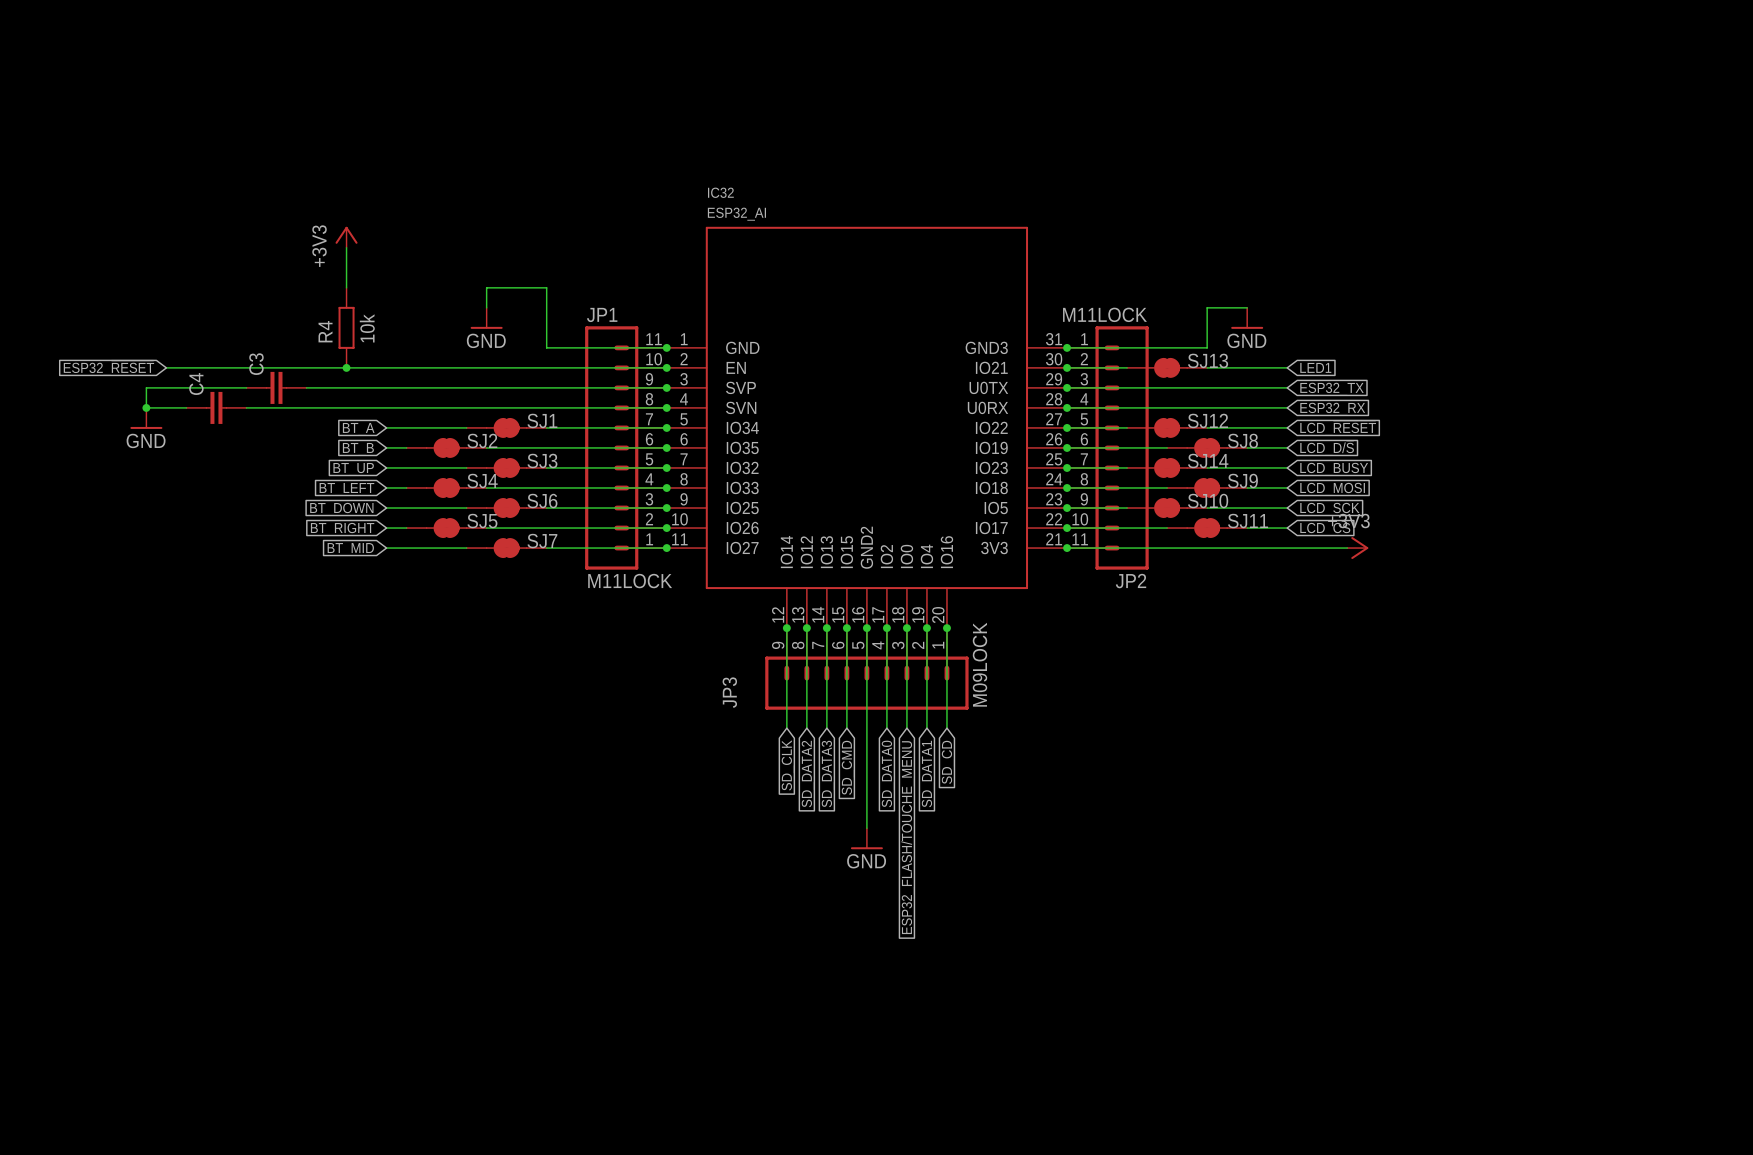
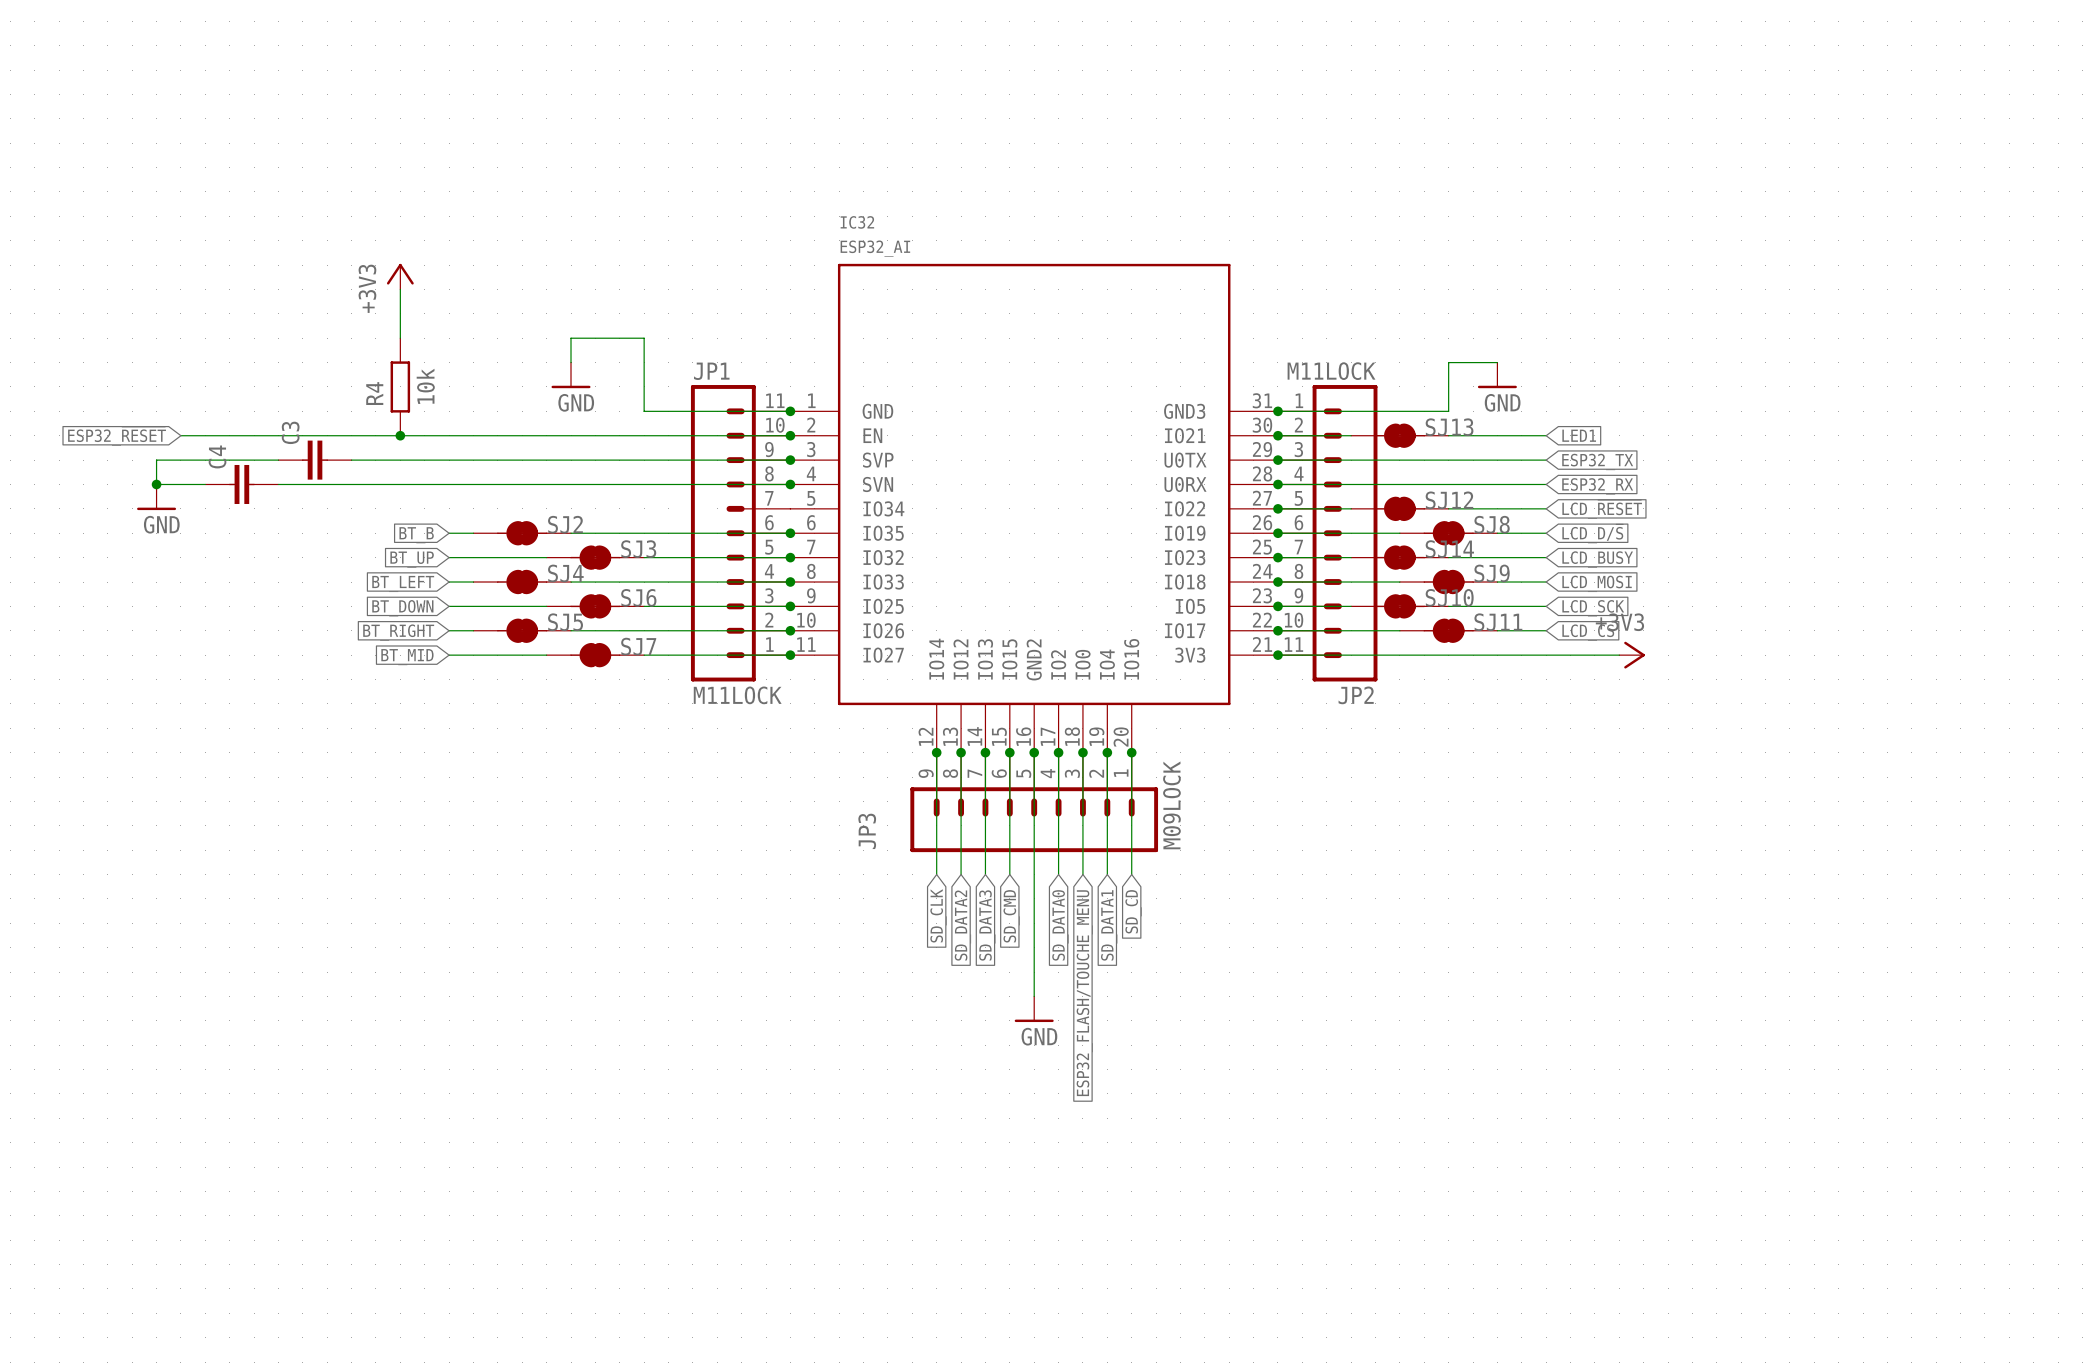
wire: (386, 427) (466, 427) -> none
SJ1: (506, 427) -> none
wire: (546, 427) (666, 427) -> none
junction: (666, 427) -> none
global label: BT_A (358, 429) -> none

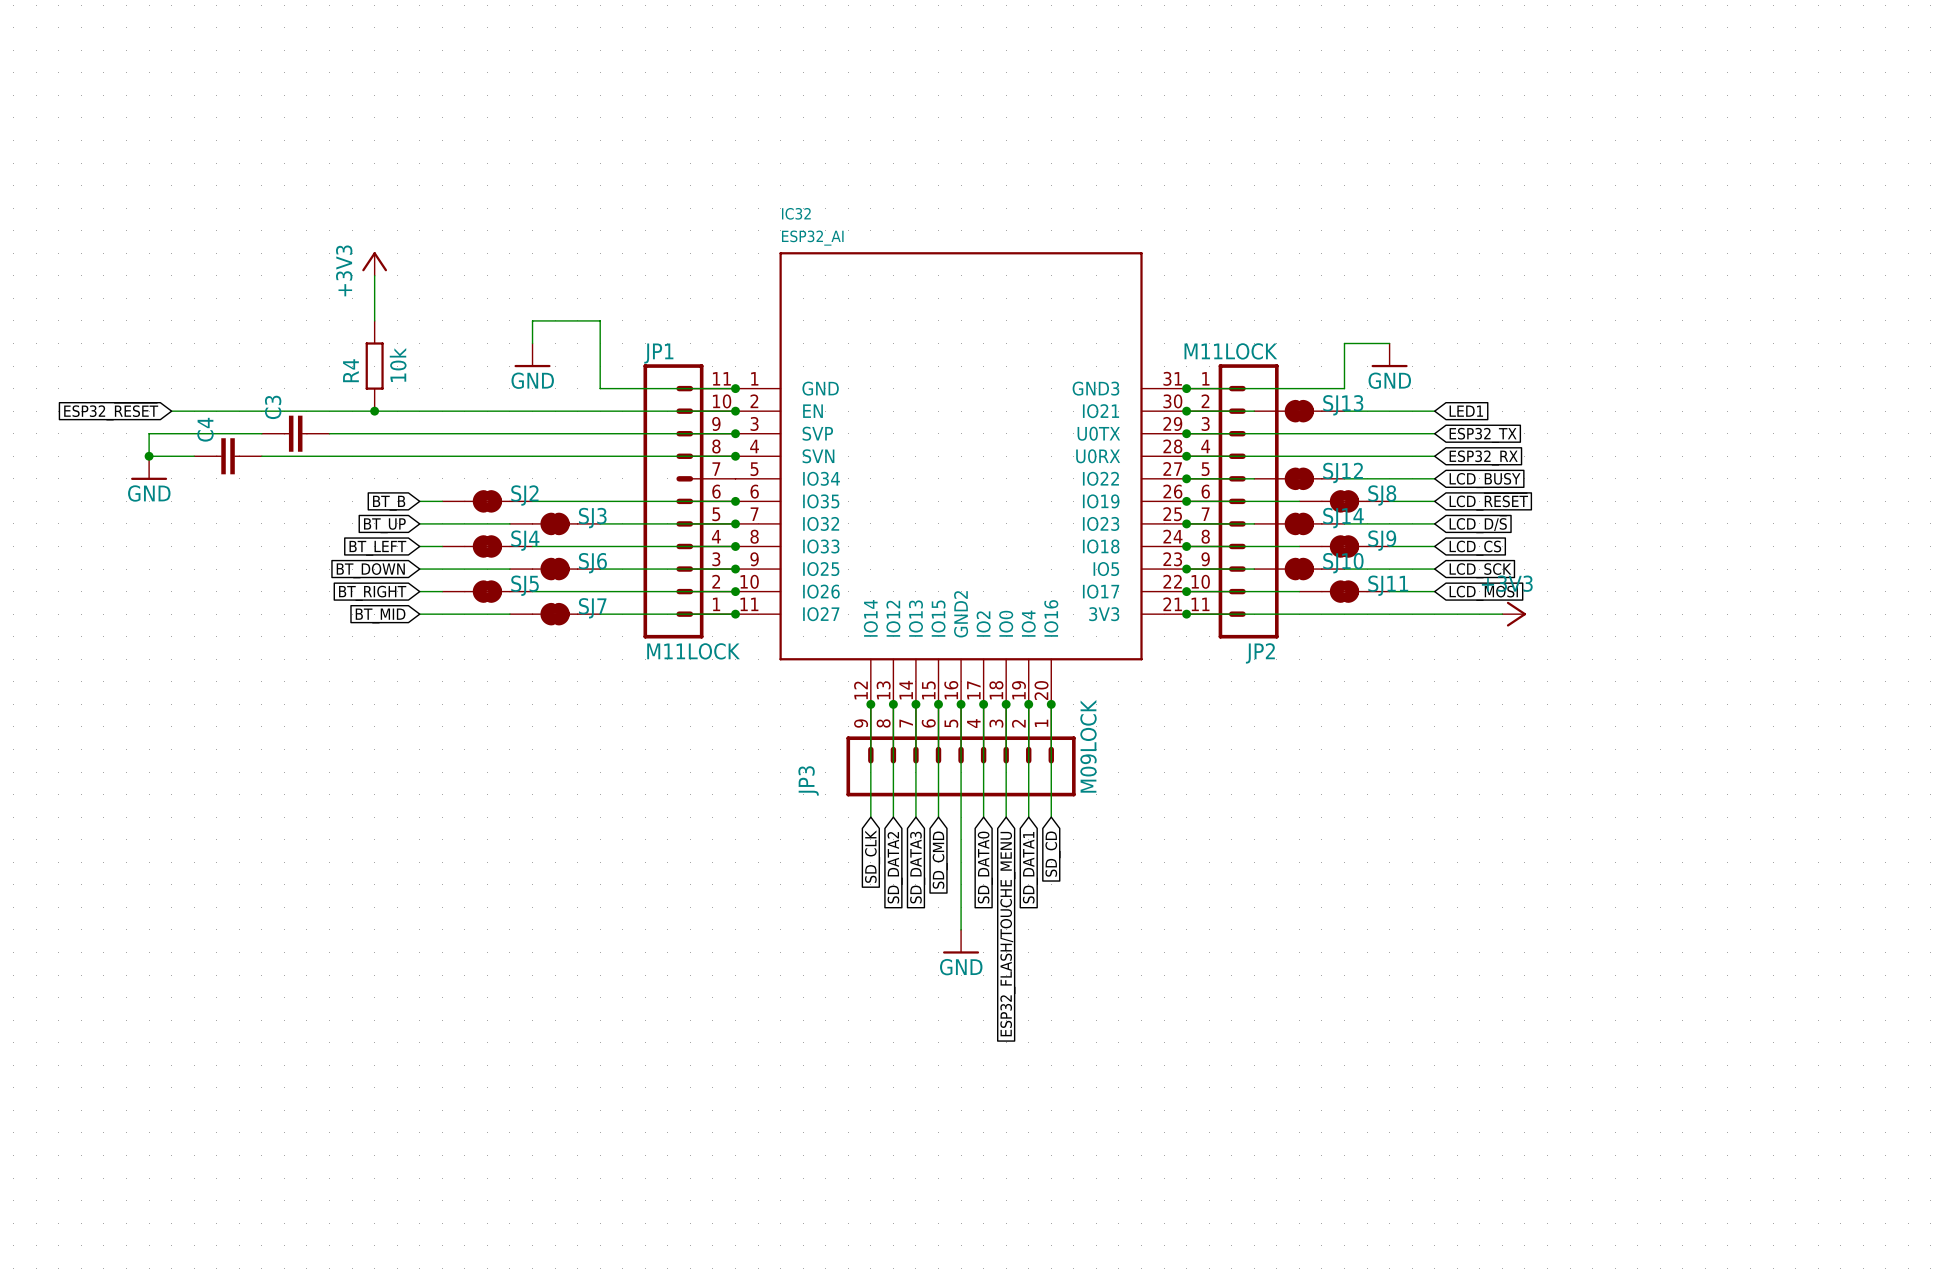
global label: LCD_~{RESET} (1602, 509) -> LCD_BUSY (1485, 480)
global label: LCD_D/~{S} (1592, 533) -> LCD_~{RESET} (1488, 501)
global label: LCD_BUSY (1597, 559) -> LCD_D/~{S} (1478, 524)
global label: LCD_MOSI (1597, 583) -> LCD_CS (1475, 548)
global label: LCD_CS (1588, 632) -> LCD_MOSI (1483, 593)

